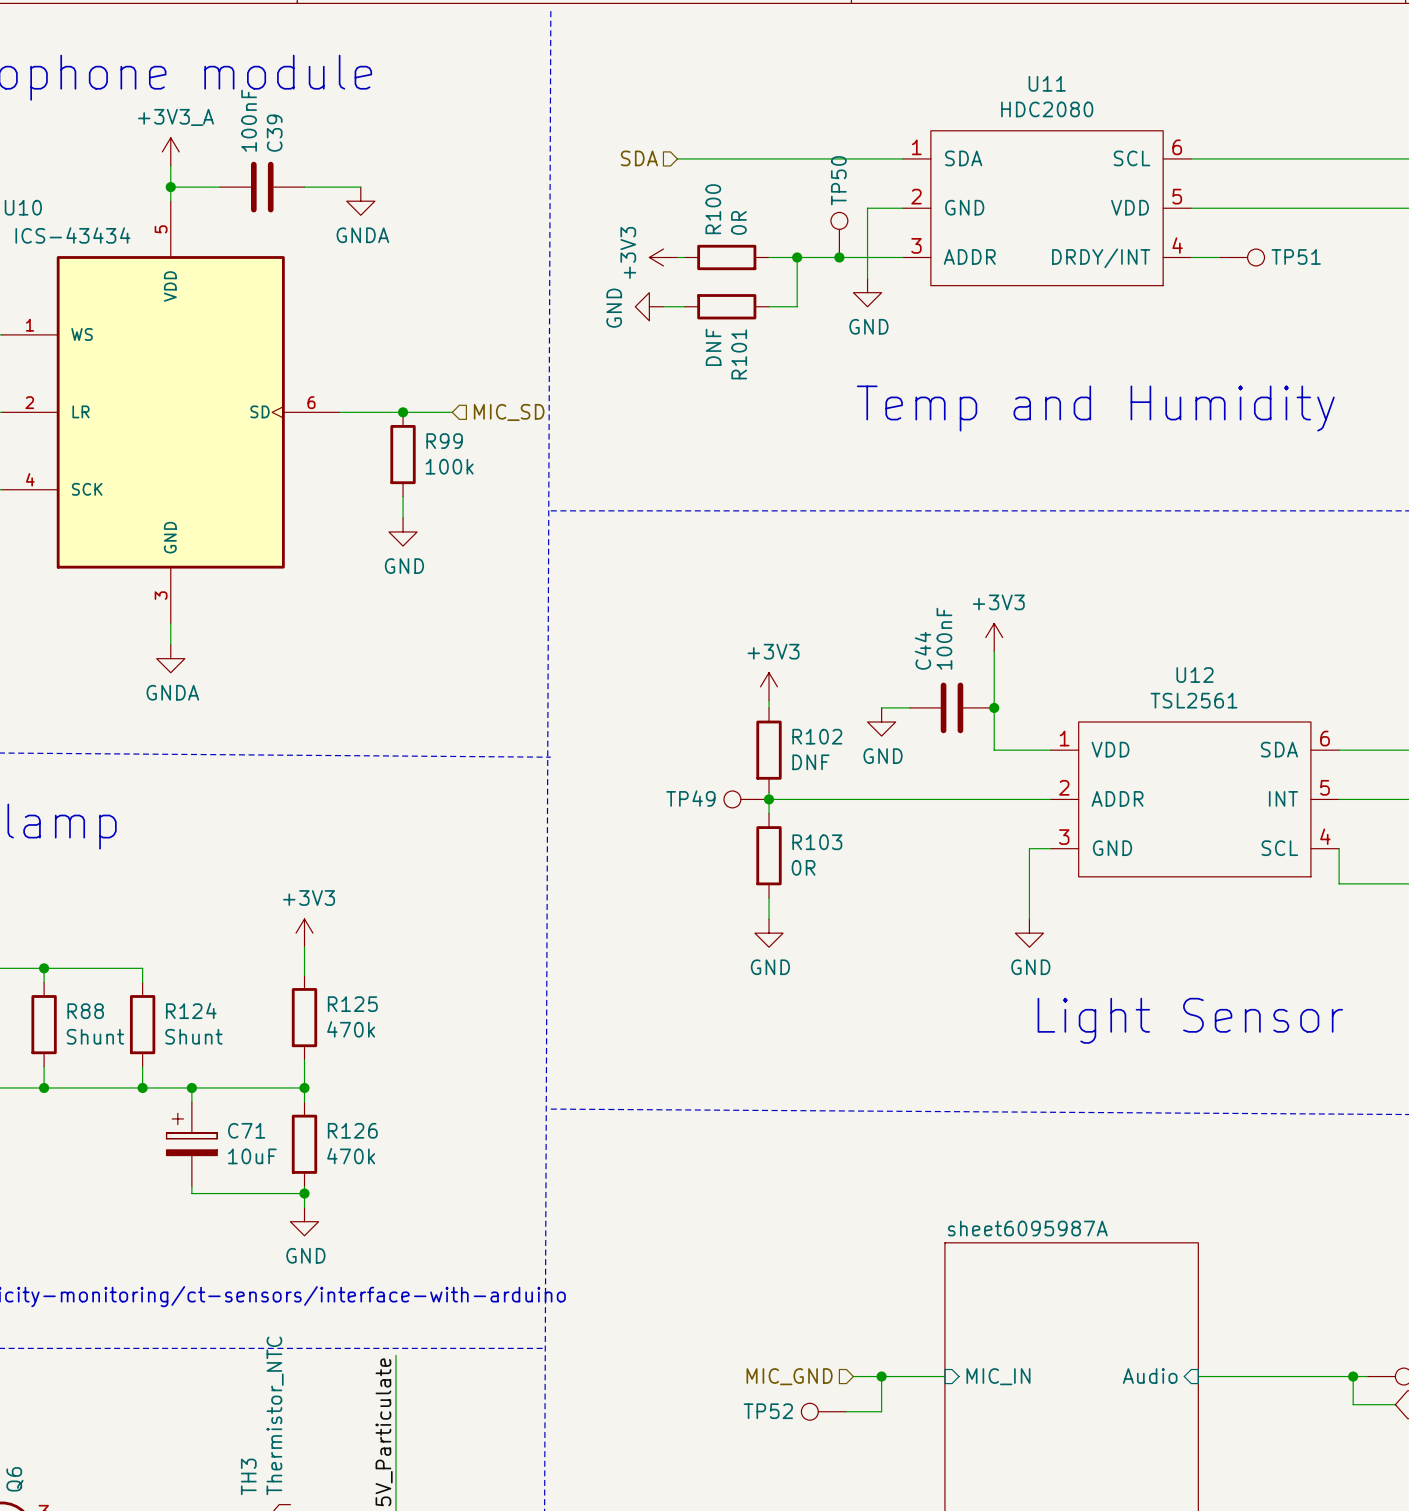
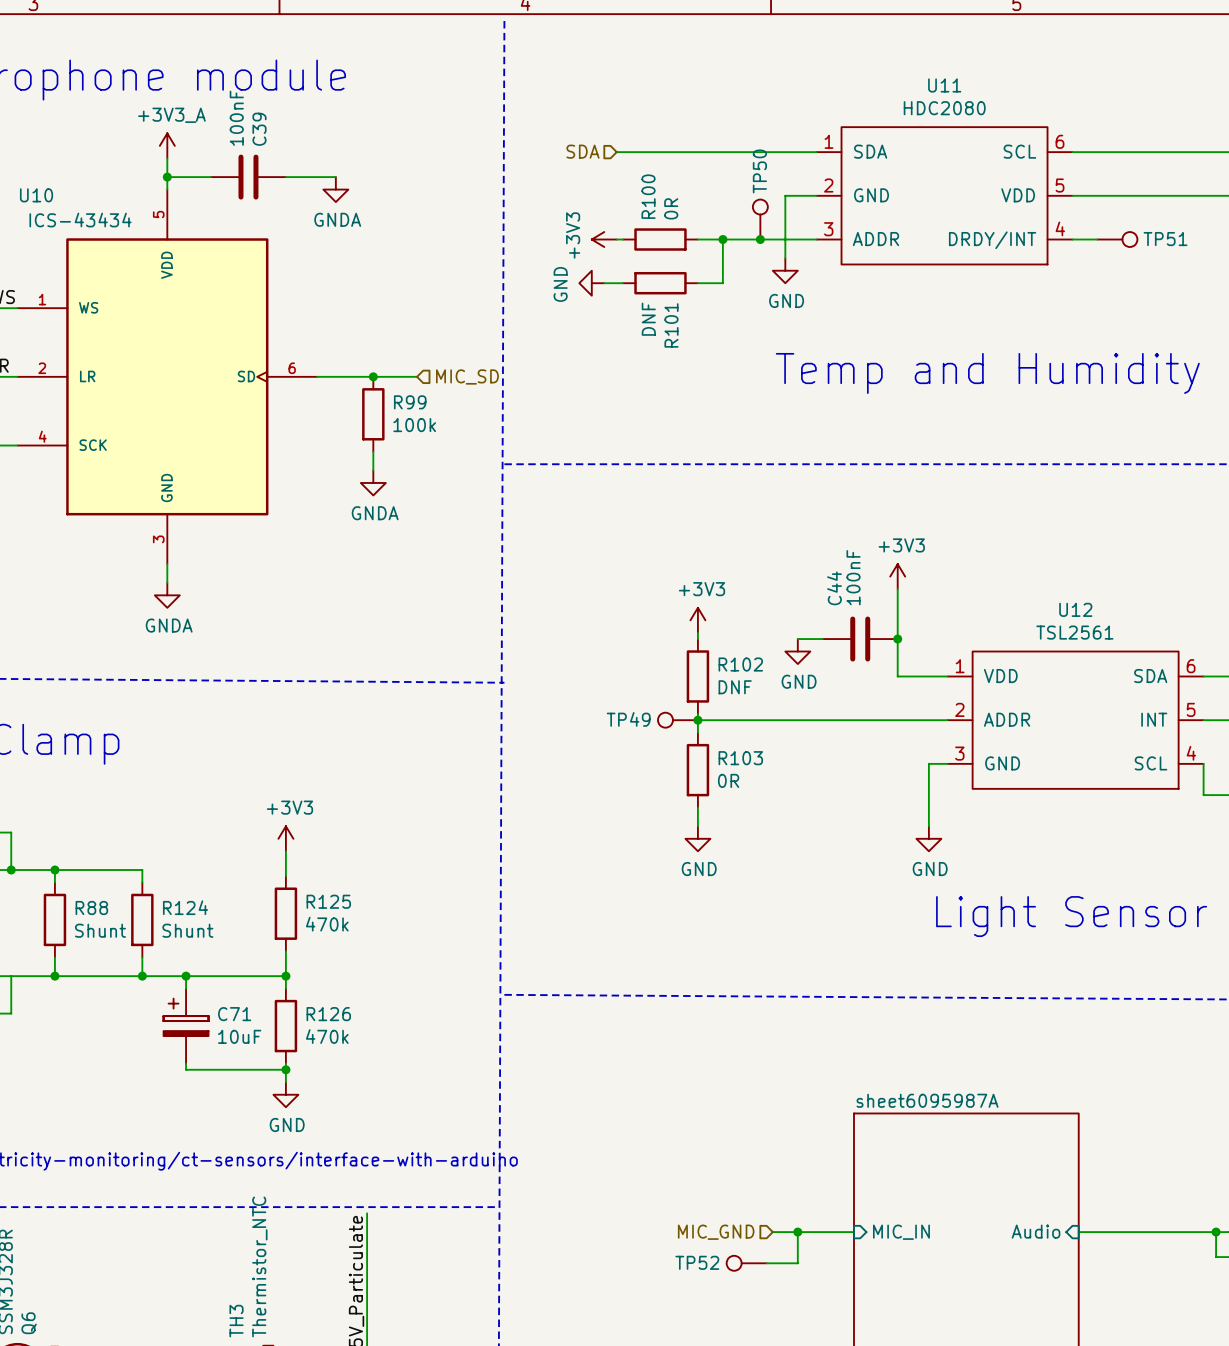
power symbol: GND (403, 531) -> GNDA (373, 482)

